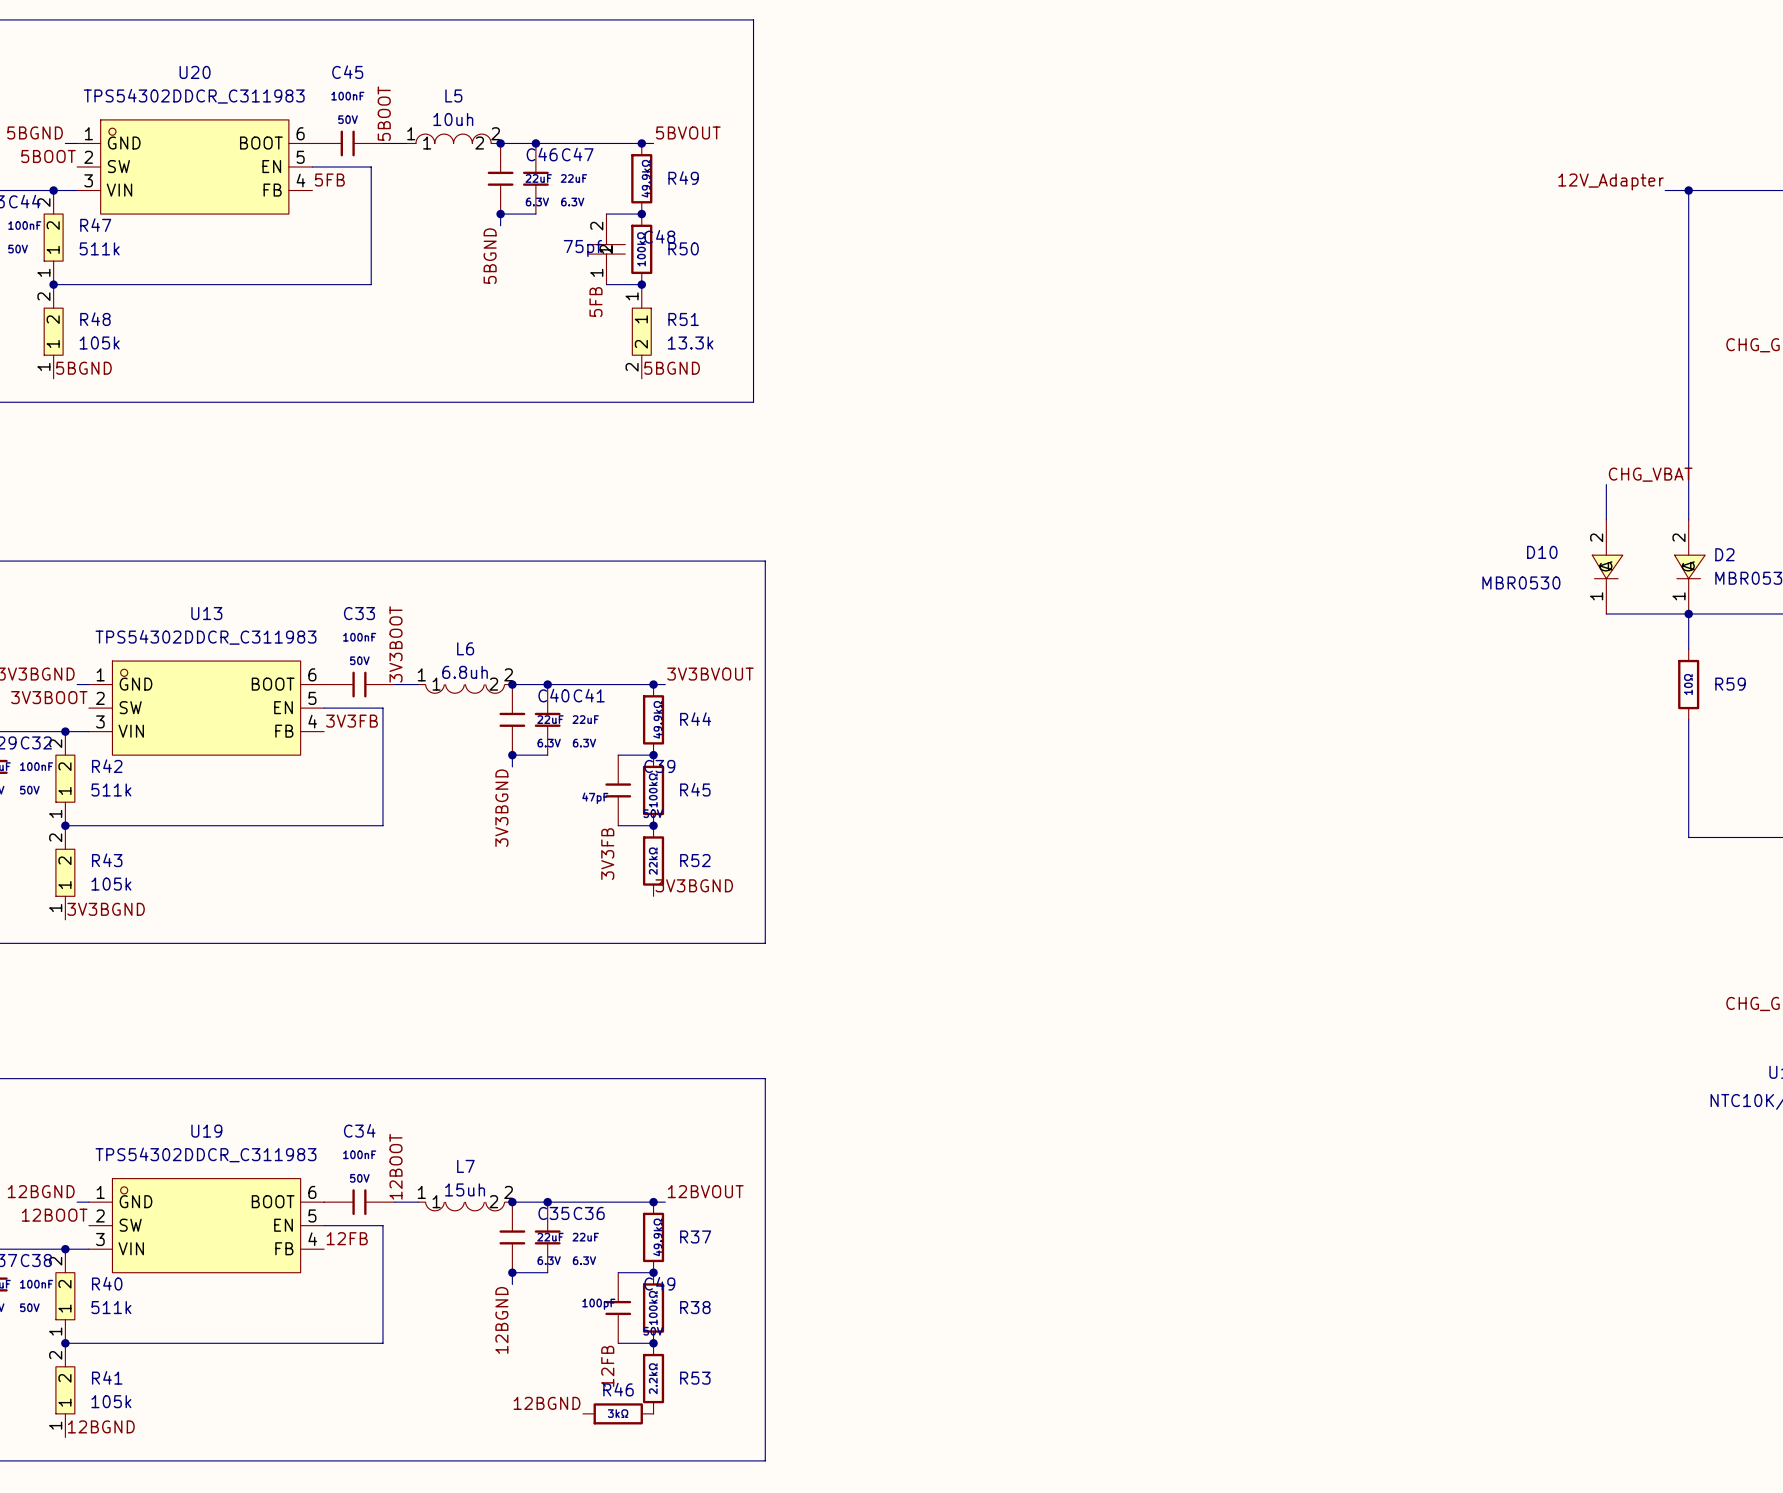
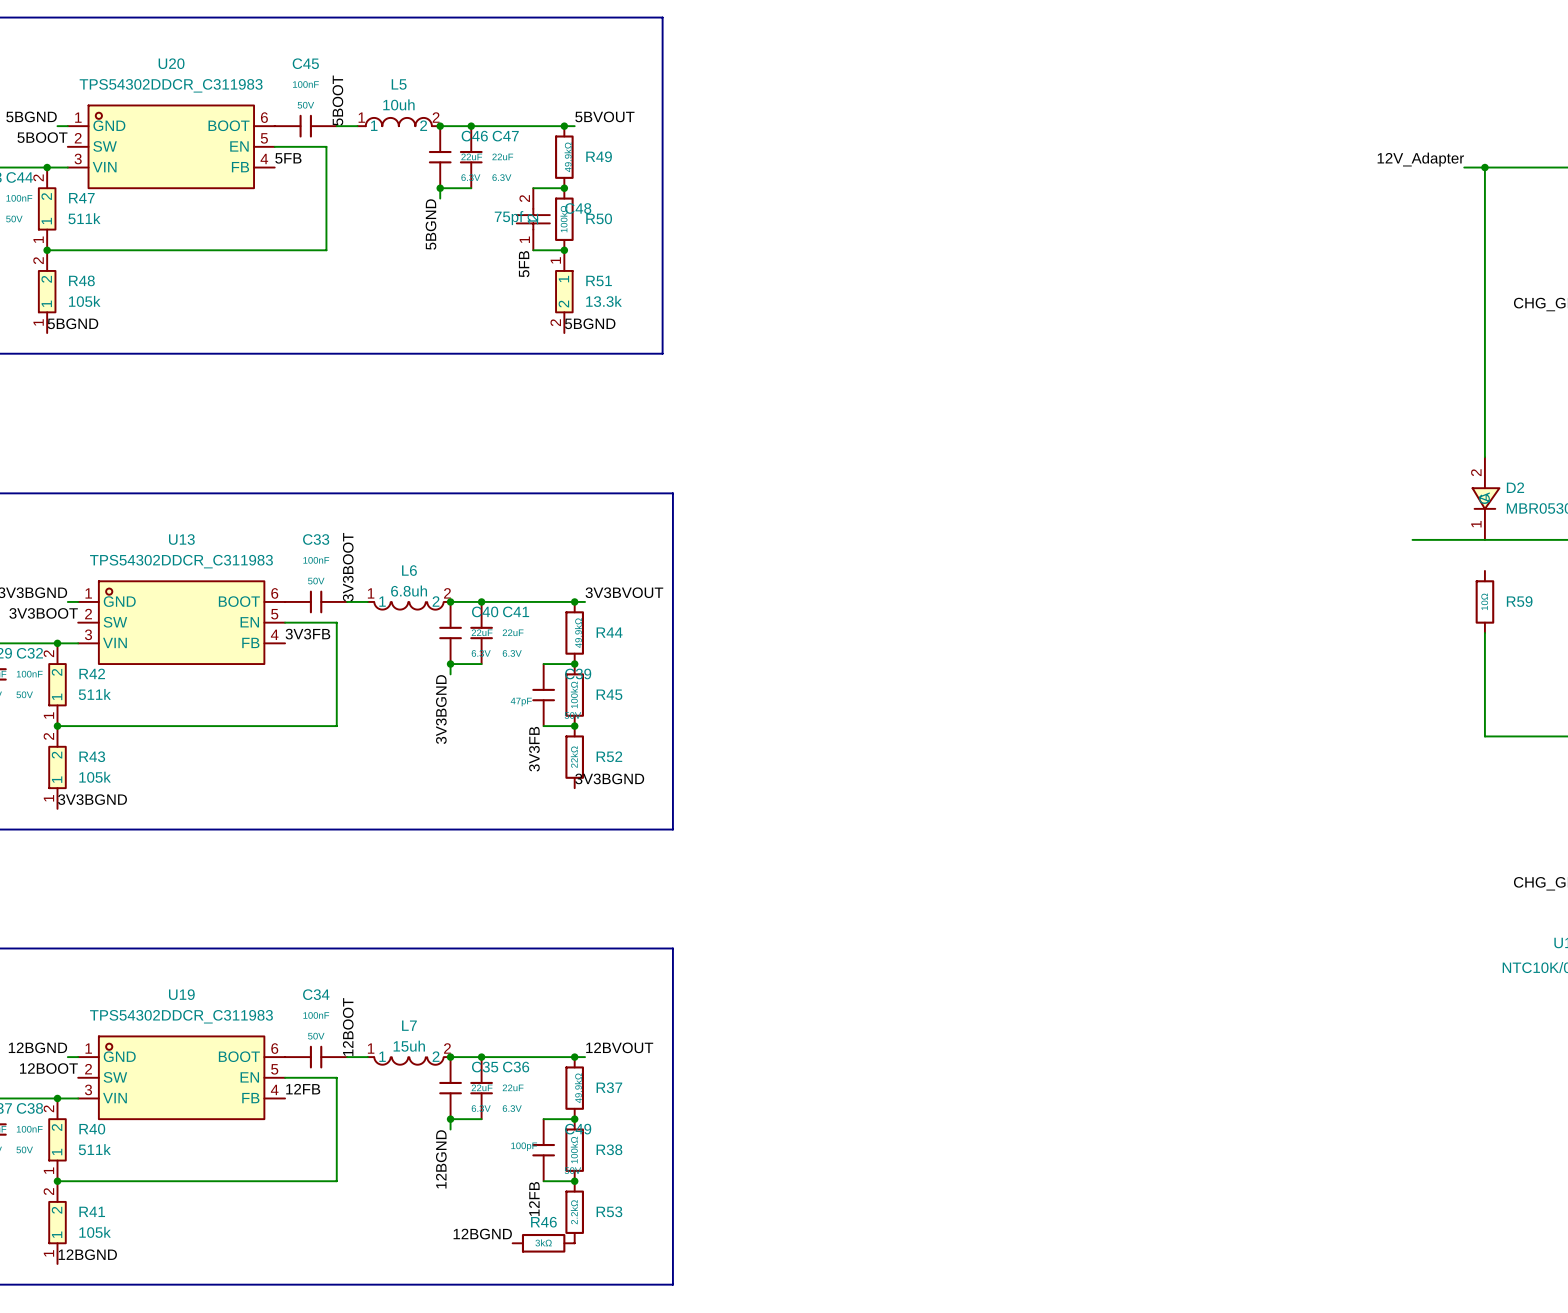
label: CHG_VBAT (1650, 474) -> none
wire: (1606, 484) (1606, 519) -> none
D10: MBR0530 (1607, 566) -> none
wire: (1688, 613) (1688, 649) -> none
junction: (1688, 613) -> none

